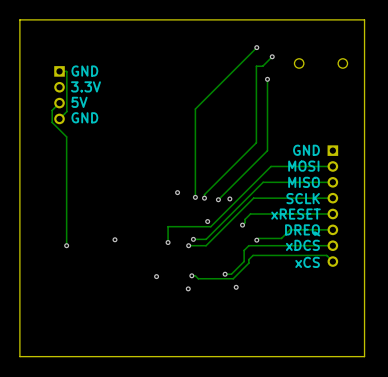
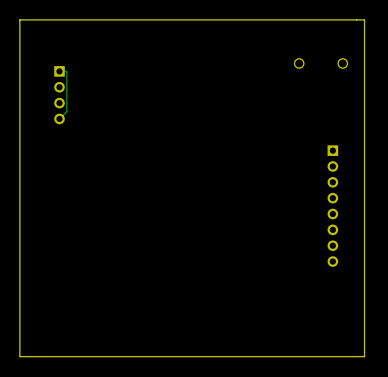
track: (256, 47) (195, 109) (195, 197) -> none
via: (256, 47) -> none
track: (272, 56) (262, 66) (256, 66) (256, 142) (204, 194) (204, 198) -> none
via: (272, 56) -> none
text: GND (84, 71) -> none
track: (267, 79) (267, 150) (218, 199) -> none
via: (267, 79) -> none
text: 3.3V (85, 86) -> none
text: 5V (79, 102) -> none
track: (59, 103) (52, 110) (52, 122) (66, 136) (66, 245) -> none
text: GND (84, 117) -> none
text: GND (306, 150) -> none
text: MOSI (303, 166) -> none
track: (332, 166) (271, 166) (210, 226) (168, 226) (168, 242) -> none
text: MISO (304, 182) -> none
track: (332, 182) (263, 182) (206, 239) (193, 239) -> none
via: (177, 192) -> none
via: (195, 197) -> none
via: (204, 198) -> none
via: (229, 198) -> none
text: SCLK (303, 198) -> none
track: (332, 198) (253, 198) (206, 245) (188, 245) -> none
via: (218, 199) -> none
text: xRESET (296, 214) -> none
track: (332, 214) (250, 214) (242, 225) -> none
via: (207, 221) -> none
via: (242, 225) -> none
track: (332, 229) (290, 229) (281, 238) (258, 238) (256, 240) -> none
text: DREQ (302, 230) -> none
via: (114, 239) -> none
via: (193, 239) -> none
via: (256, 240) -> none
via: (168, 242) -> none
via: (66, 245) -> none
via: (188, 245) -> none
text: xDCS (302, 245) -> none
track: (332, 245) (248, 245) (244, 250) (244, 261) (231, 274) (225, 274) -> none
track: (332, 261) (326, 255) (253, 255) (248, 259) (248, 263) (233, 278) (198, 278) (191, 275) -> none
text: xCS (307, 262) -> none
via: (225, 274) -> none
via: (191, 275) -> none
via: (156, 276) -> none
via: (236, 287) -> none
via: (188, 288) -> none

